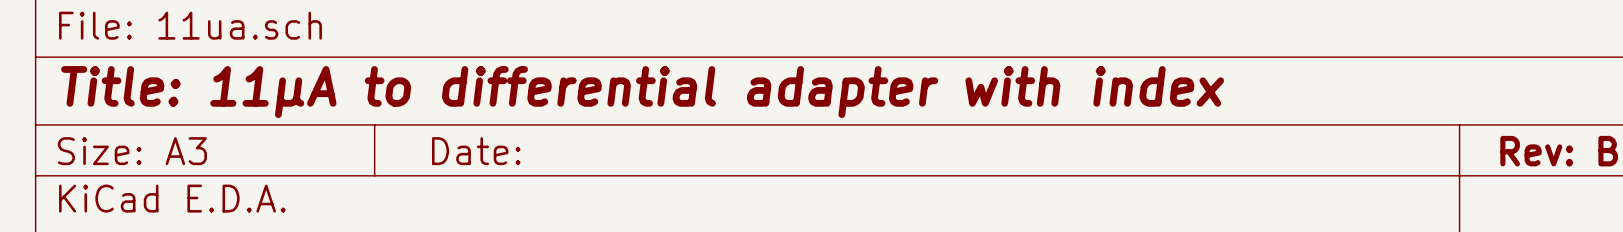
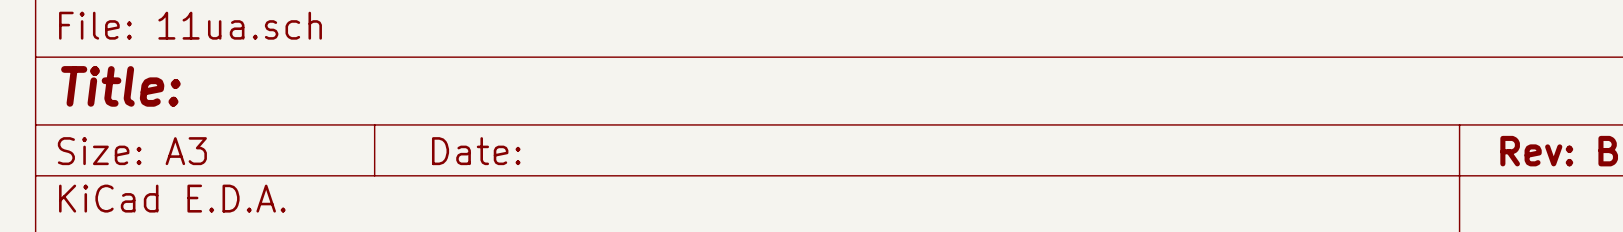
title block: Title: 11µA to differential adapter with index (642, 92) -> Title: (120, 86)

